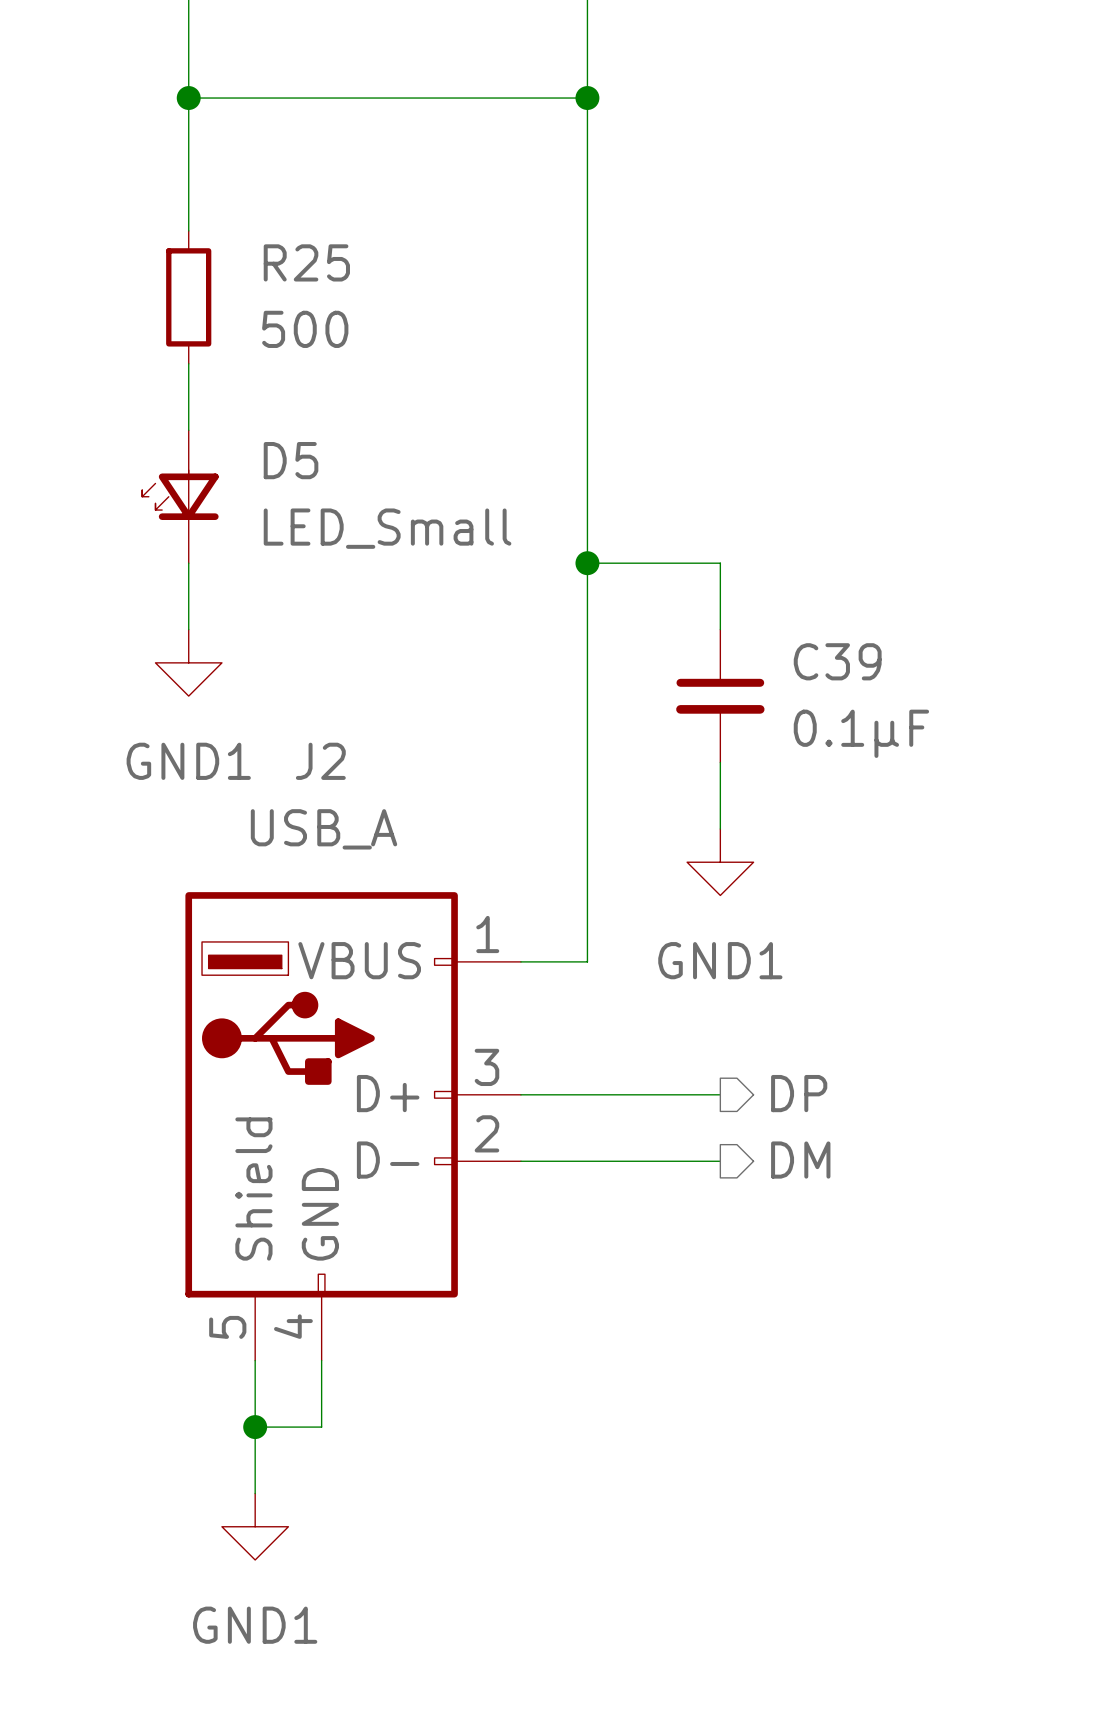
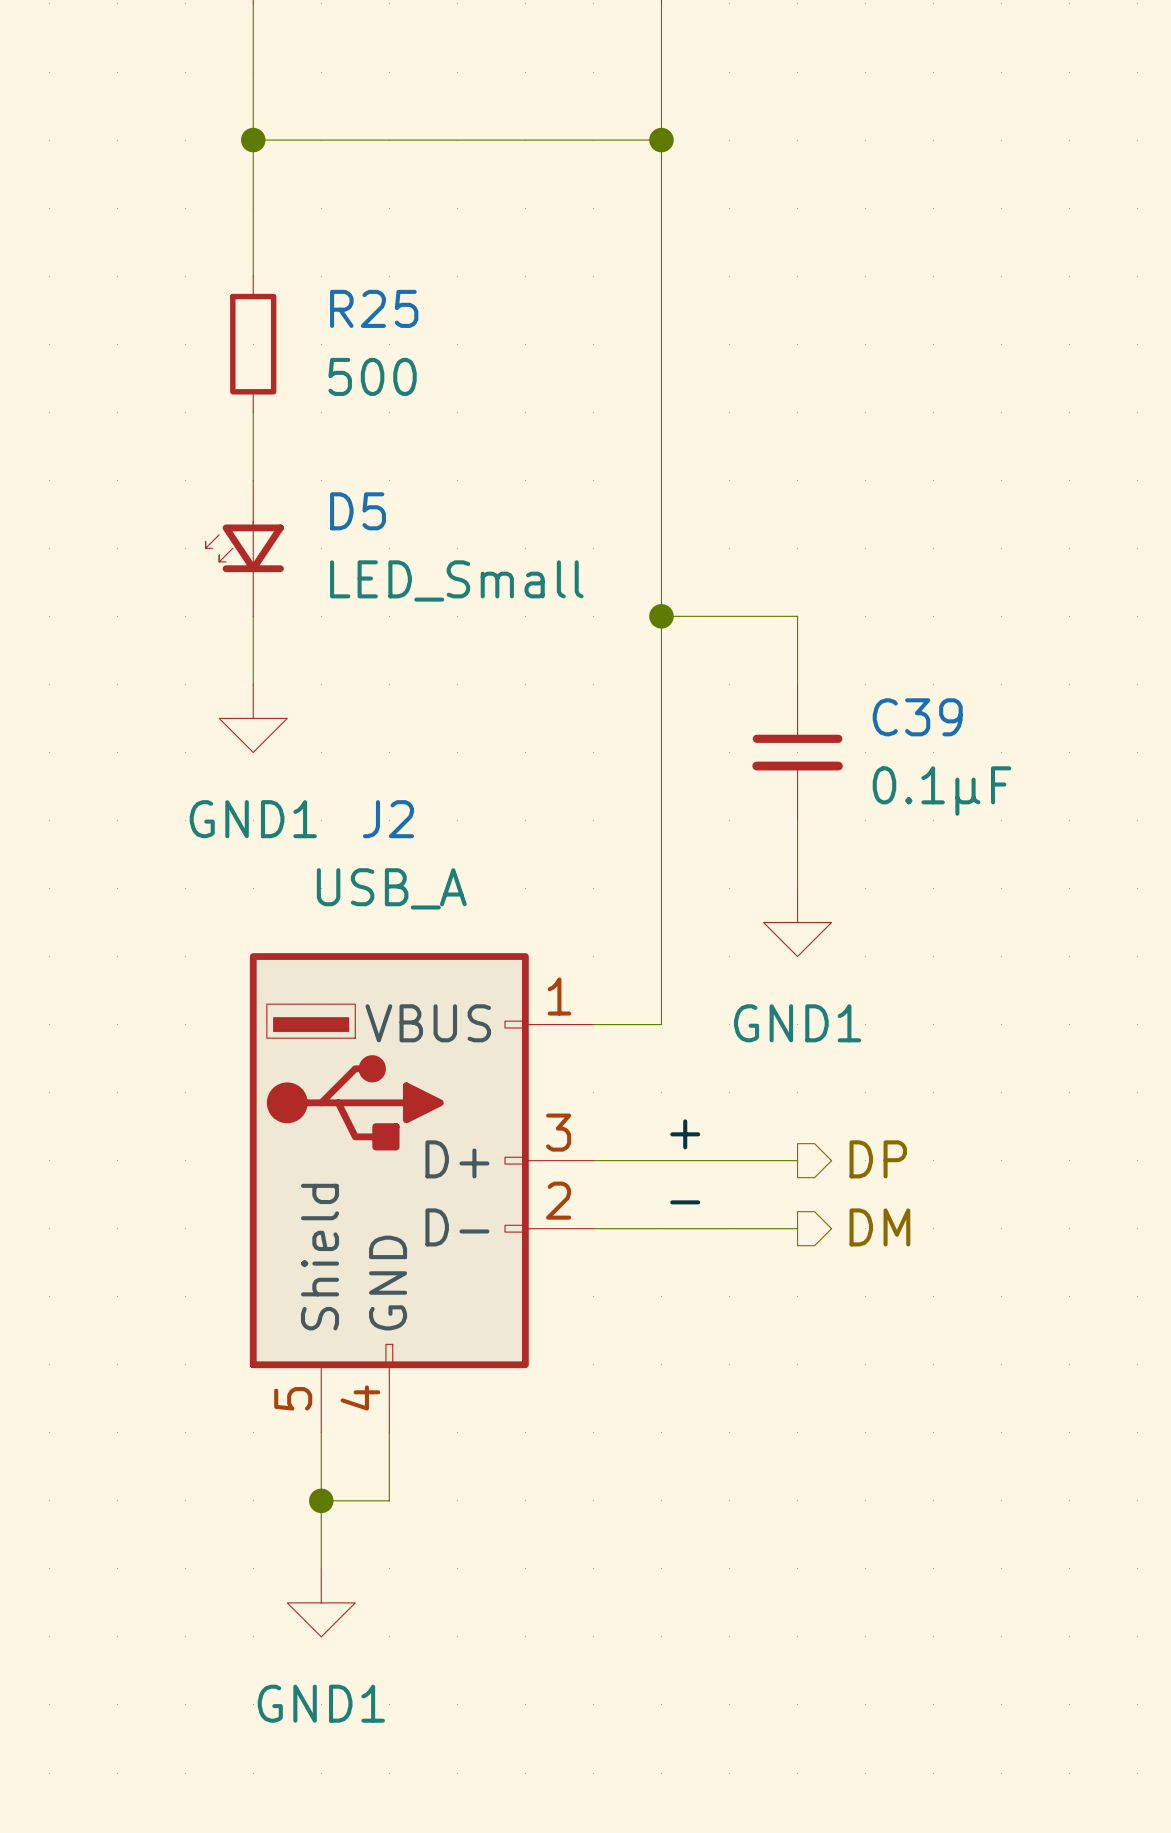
label: none -> + (685, 1134)
label: none -> - (685, 1202)

